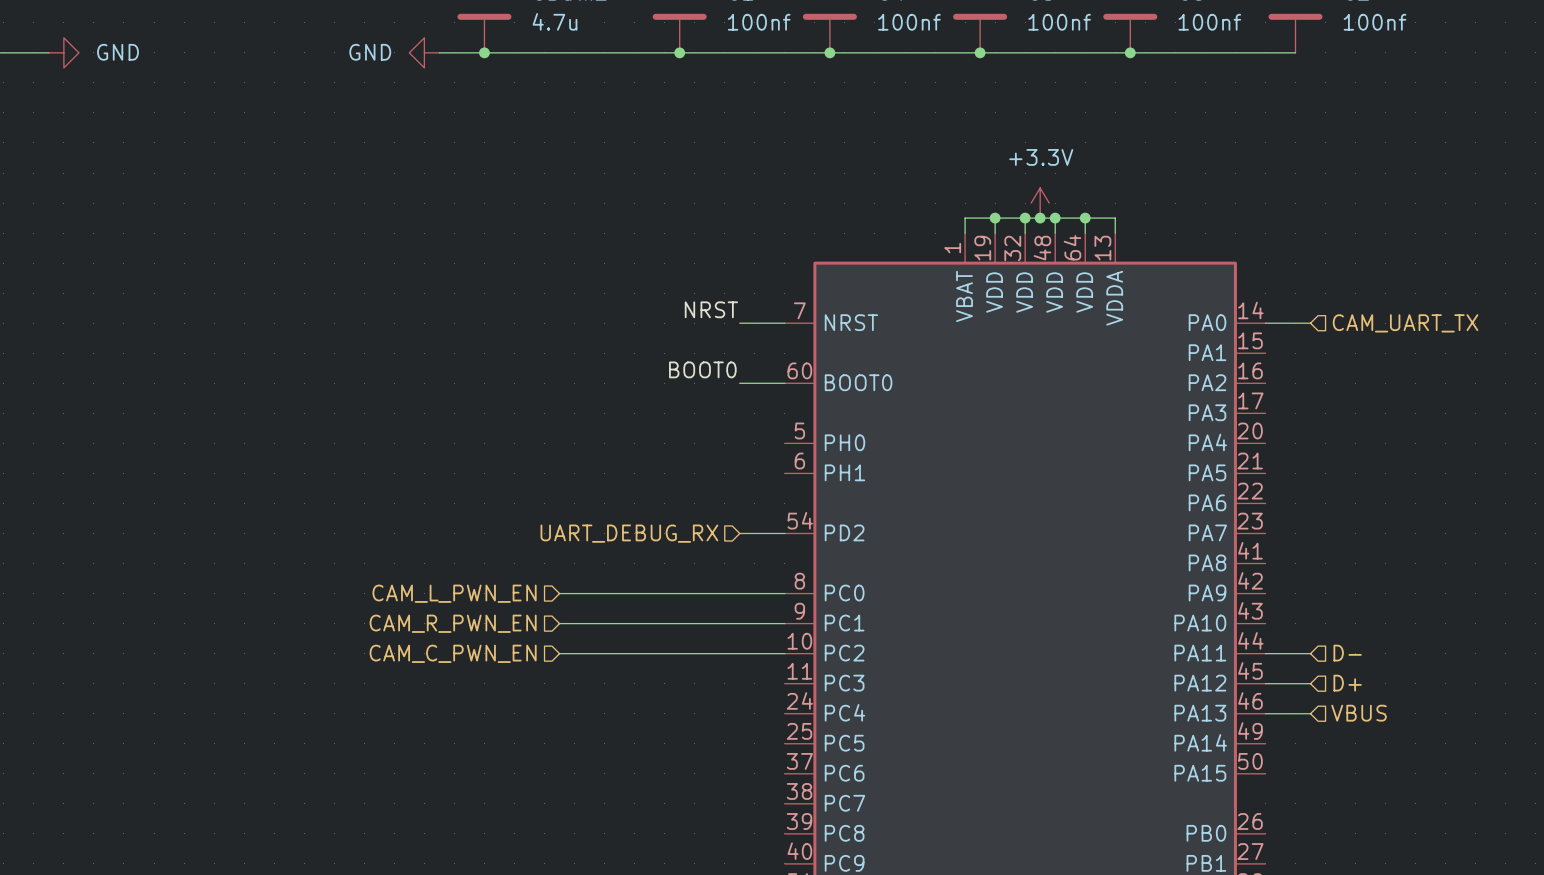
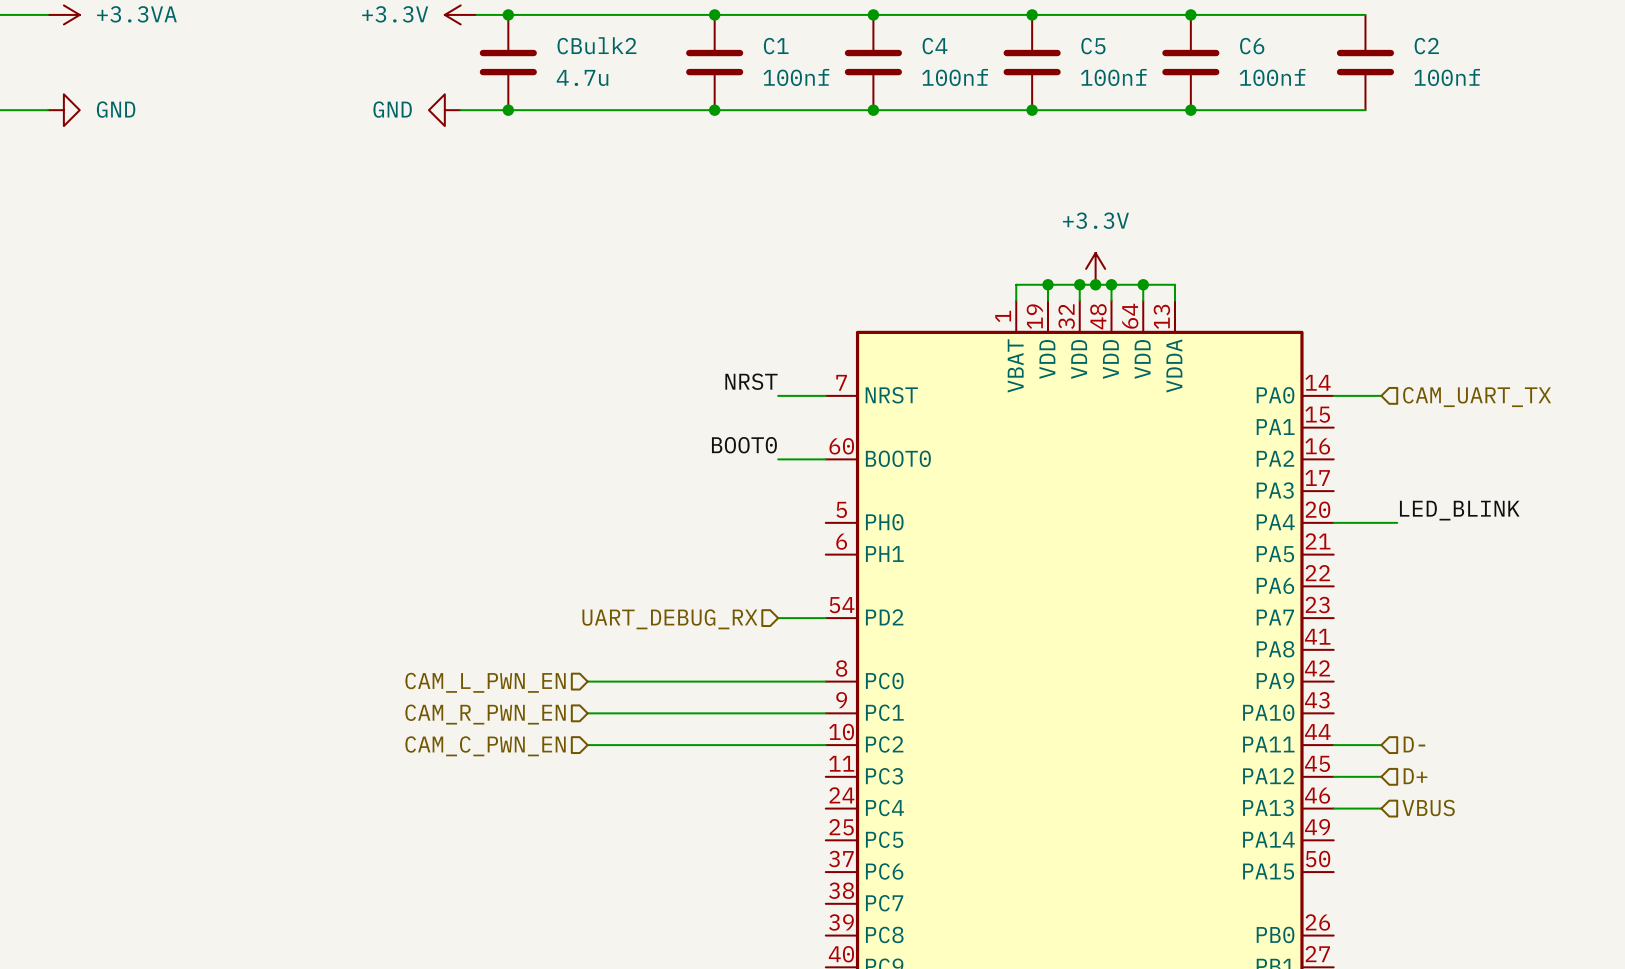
label: none -> LED_BLINK (1459, 510)
wire: none -> (1333, 522) (1397, 522)

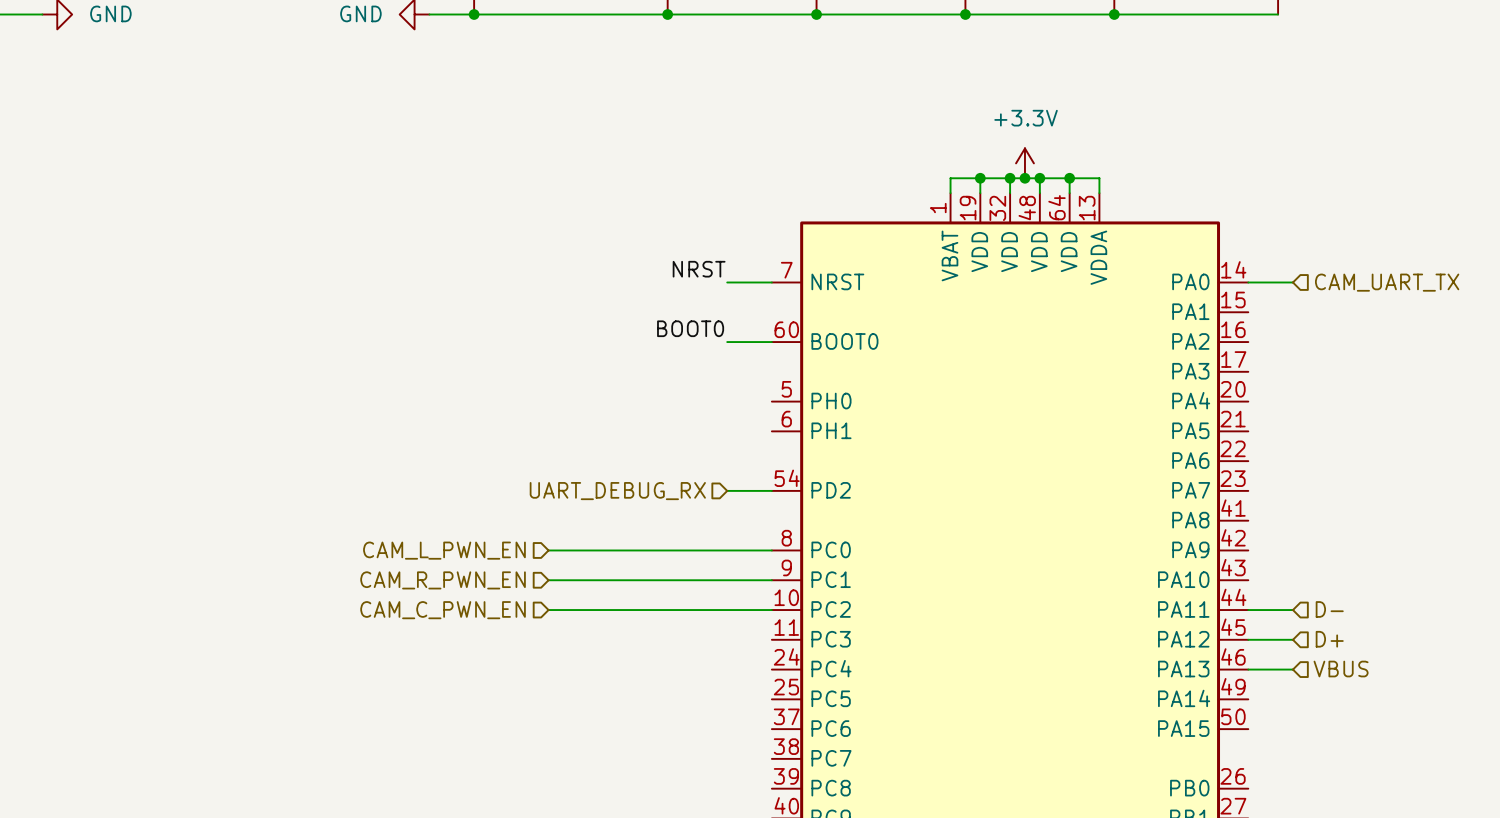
label: LED_BLINK (1459, 510) -> none
wire: (1333, 522) (1397, 522) -> none

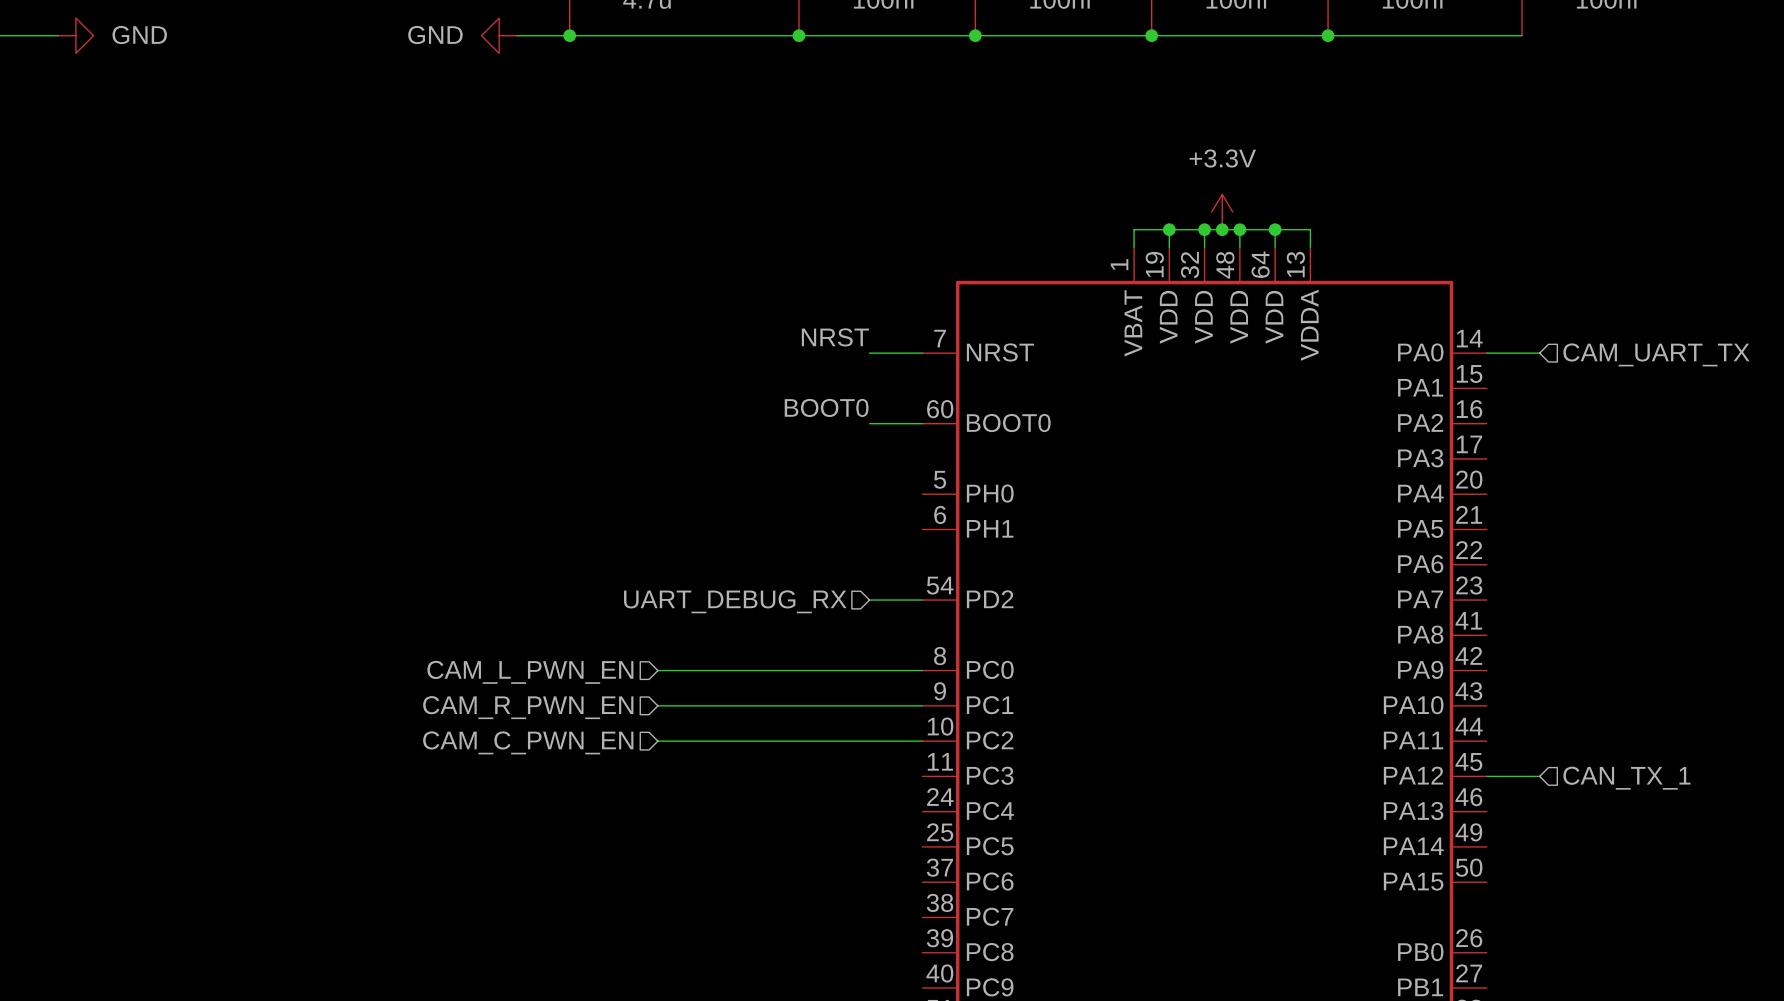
hierarchical label: D- (1329, 609) -> none
wire: (1248, 610) (1292, 610) -> none
hierarchical label: D+ (1329, 639) -> CAN_TX_1 (1626, 778)
wire: (1248, 669) (1292, 669) -> none
hierarchical label: VBUS (1341, 669) -> none

